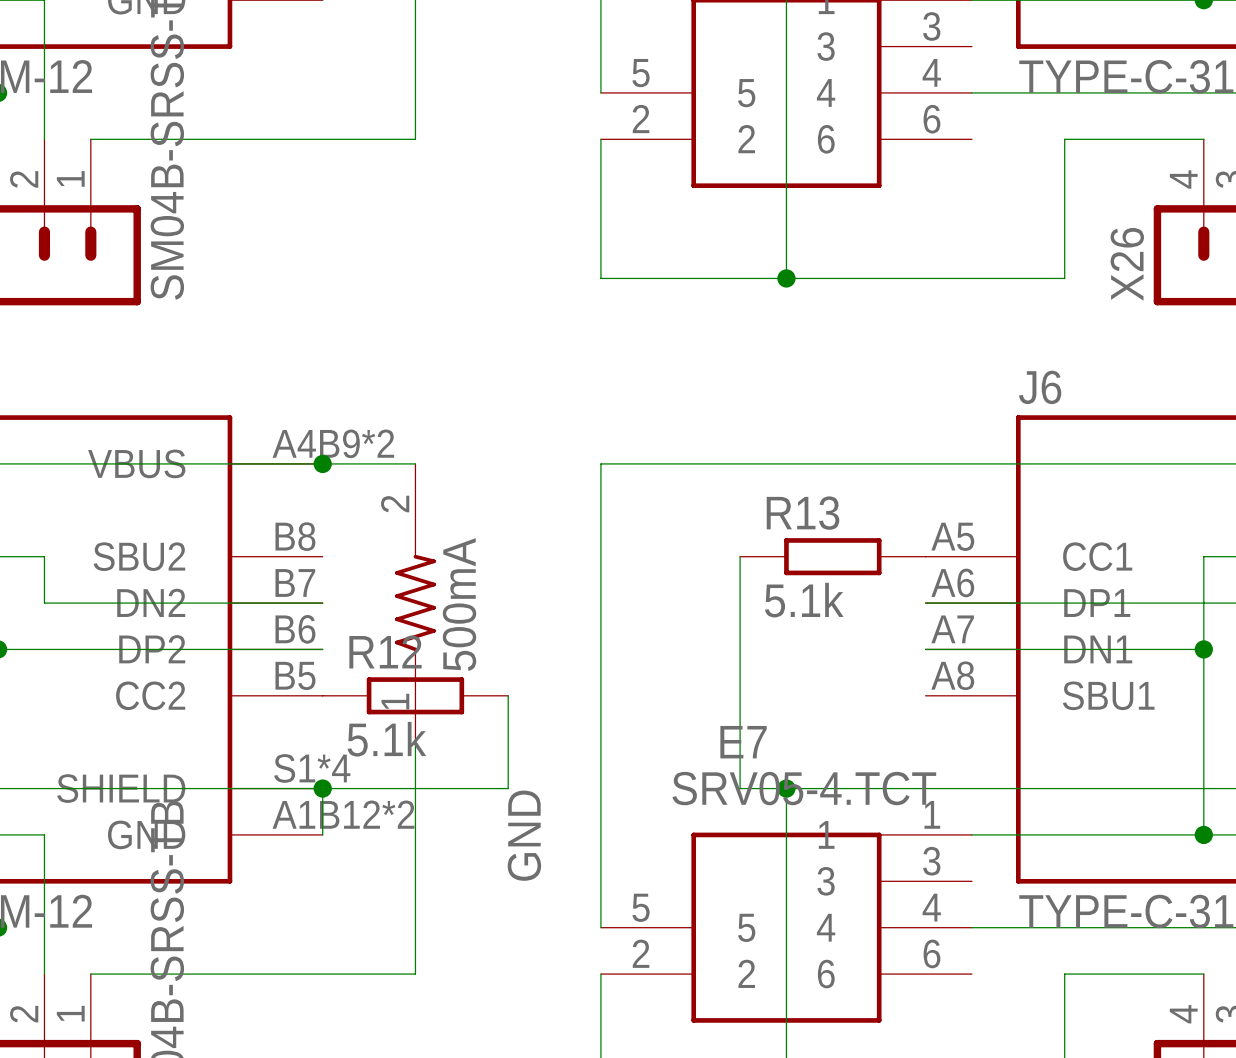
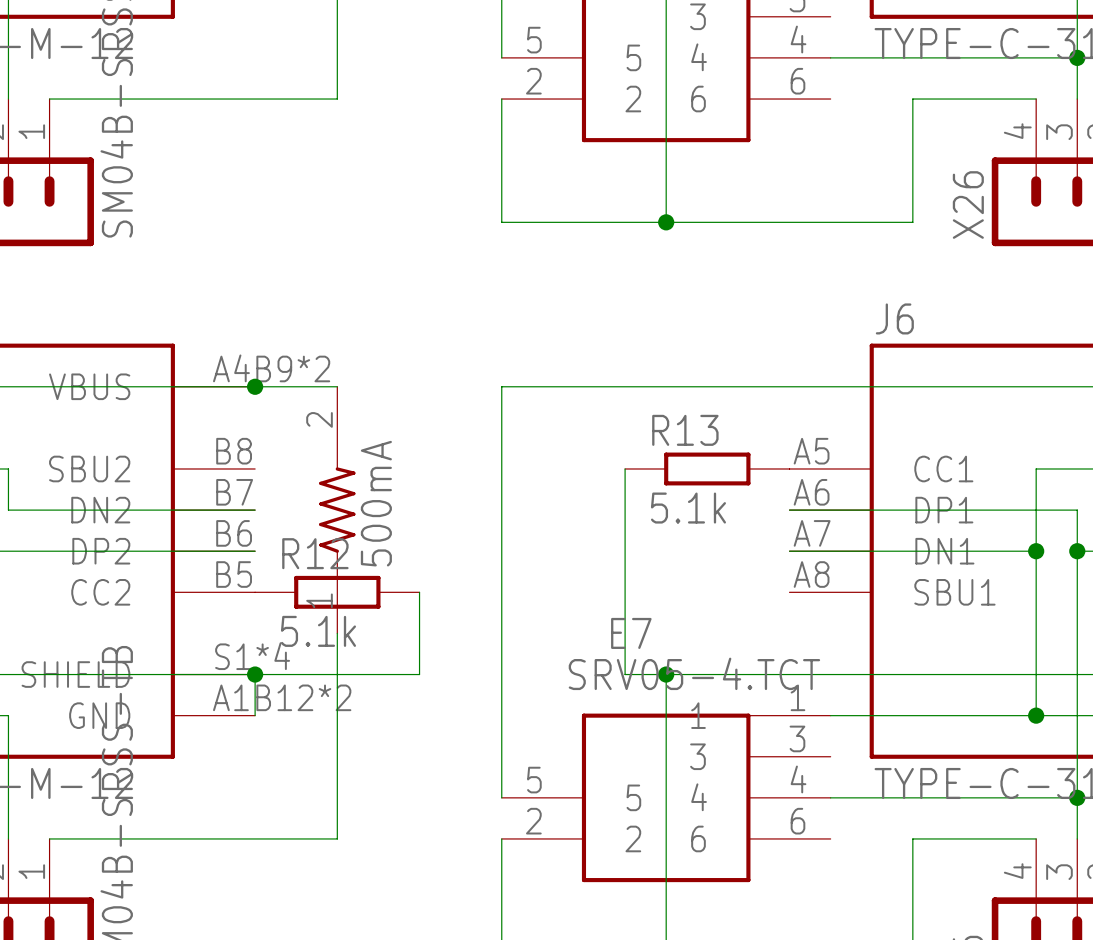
label: GND (524, 835) -> none

